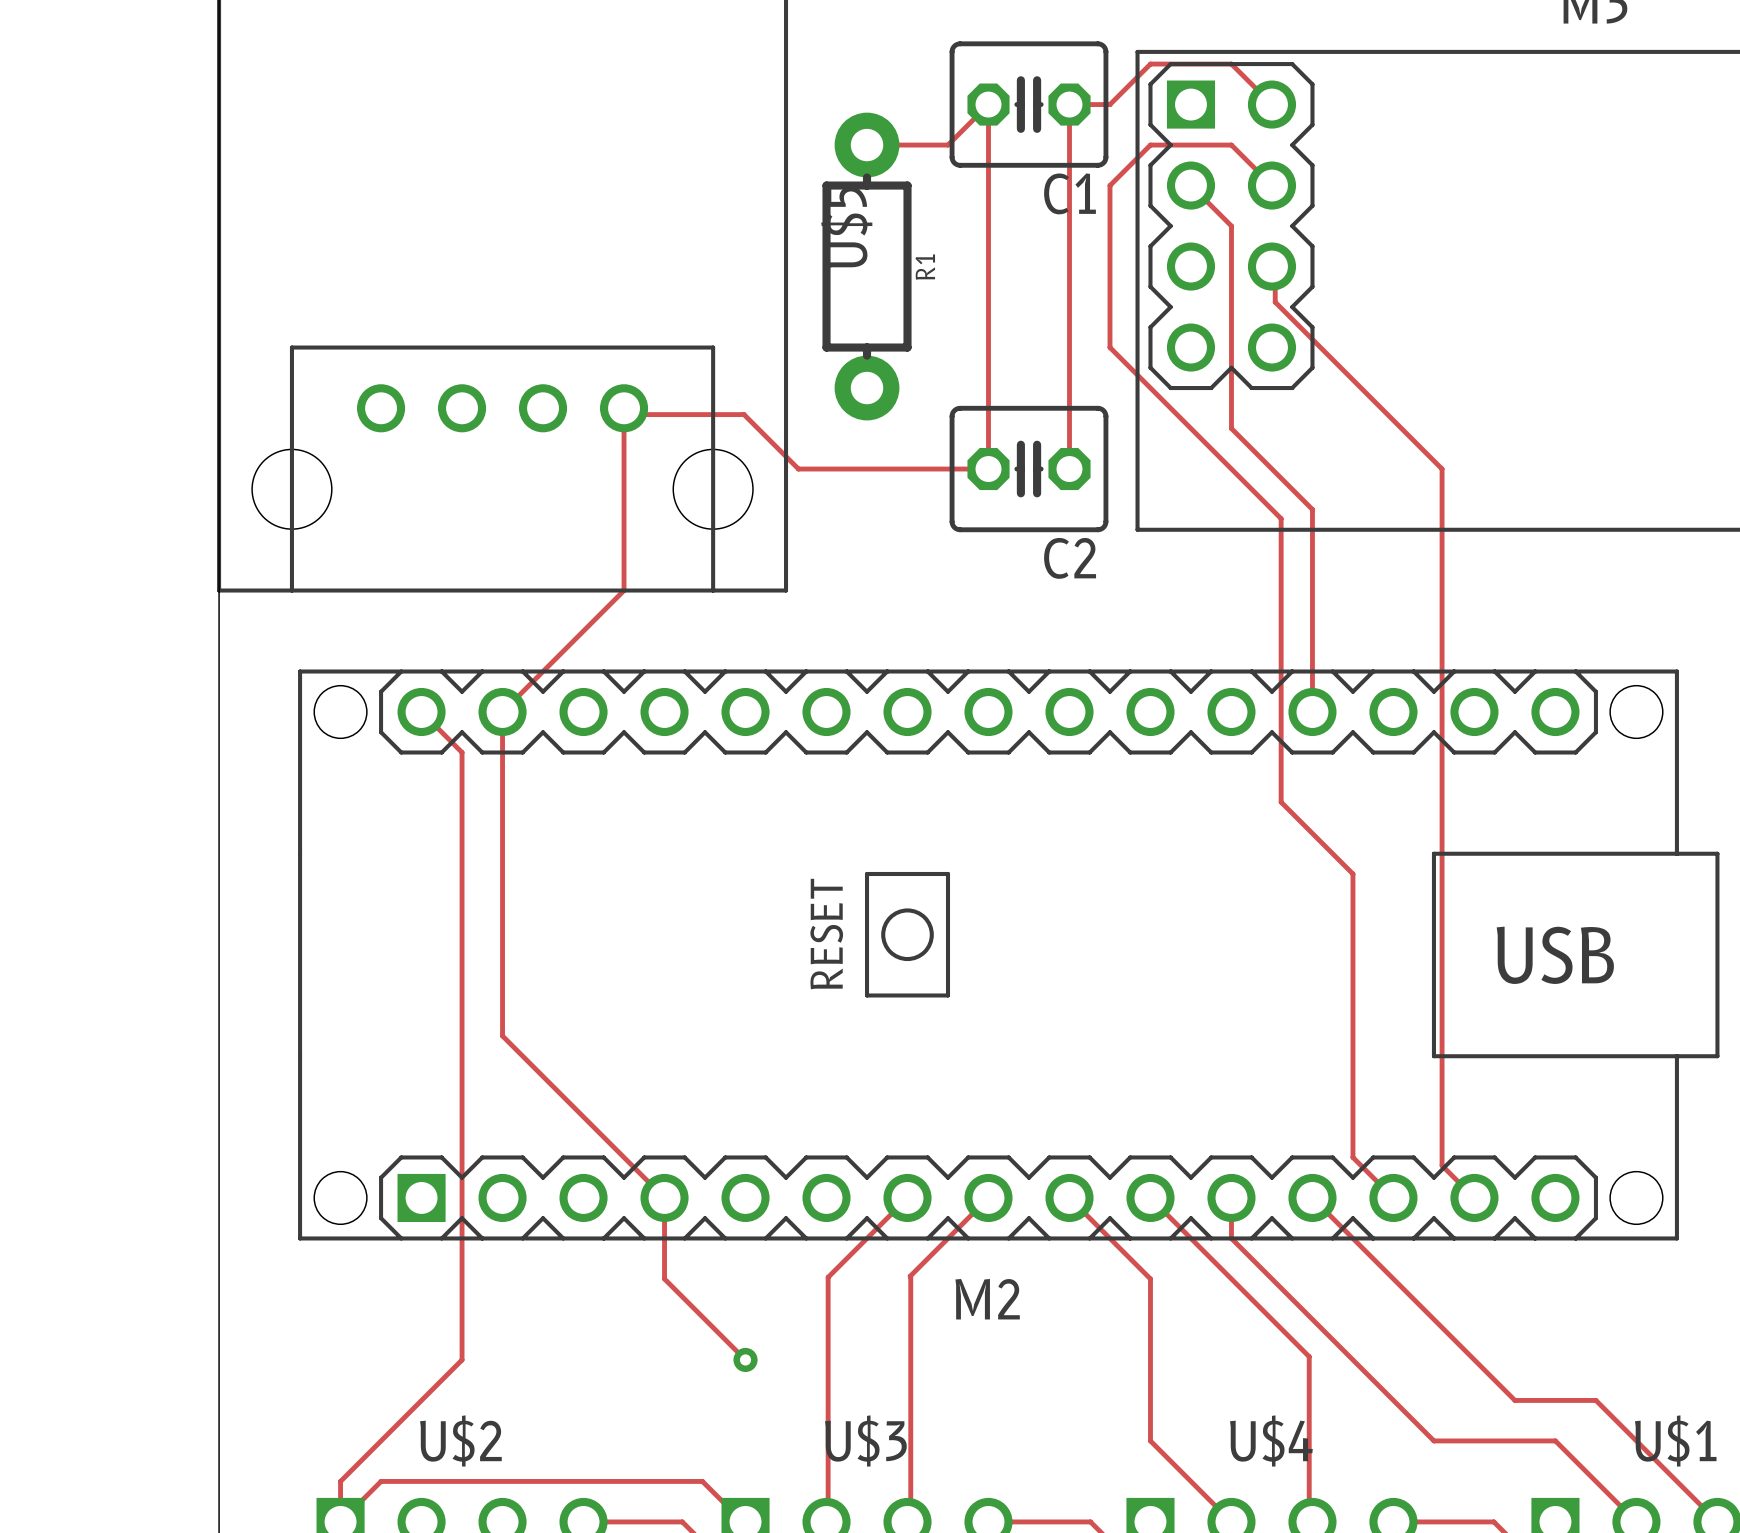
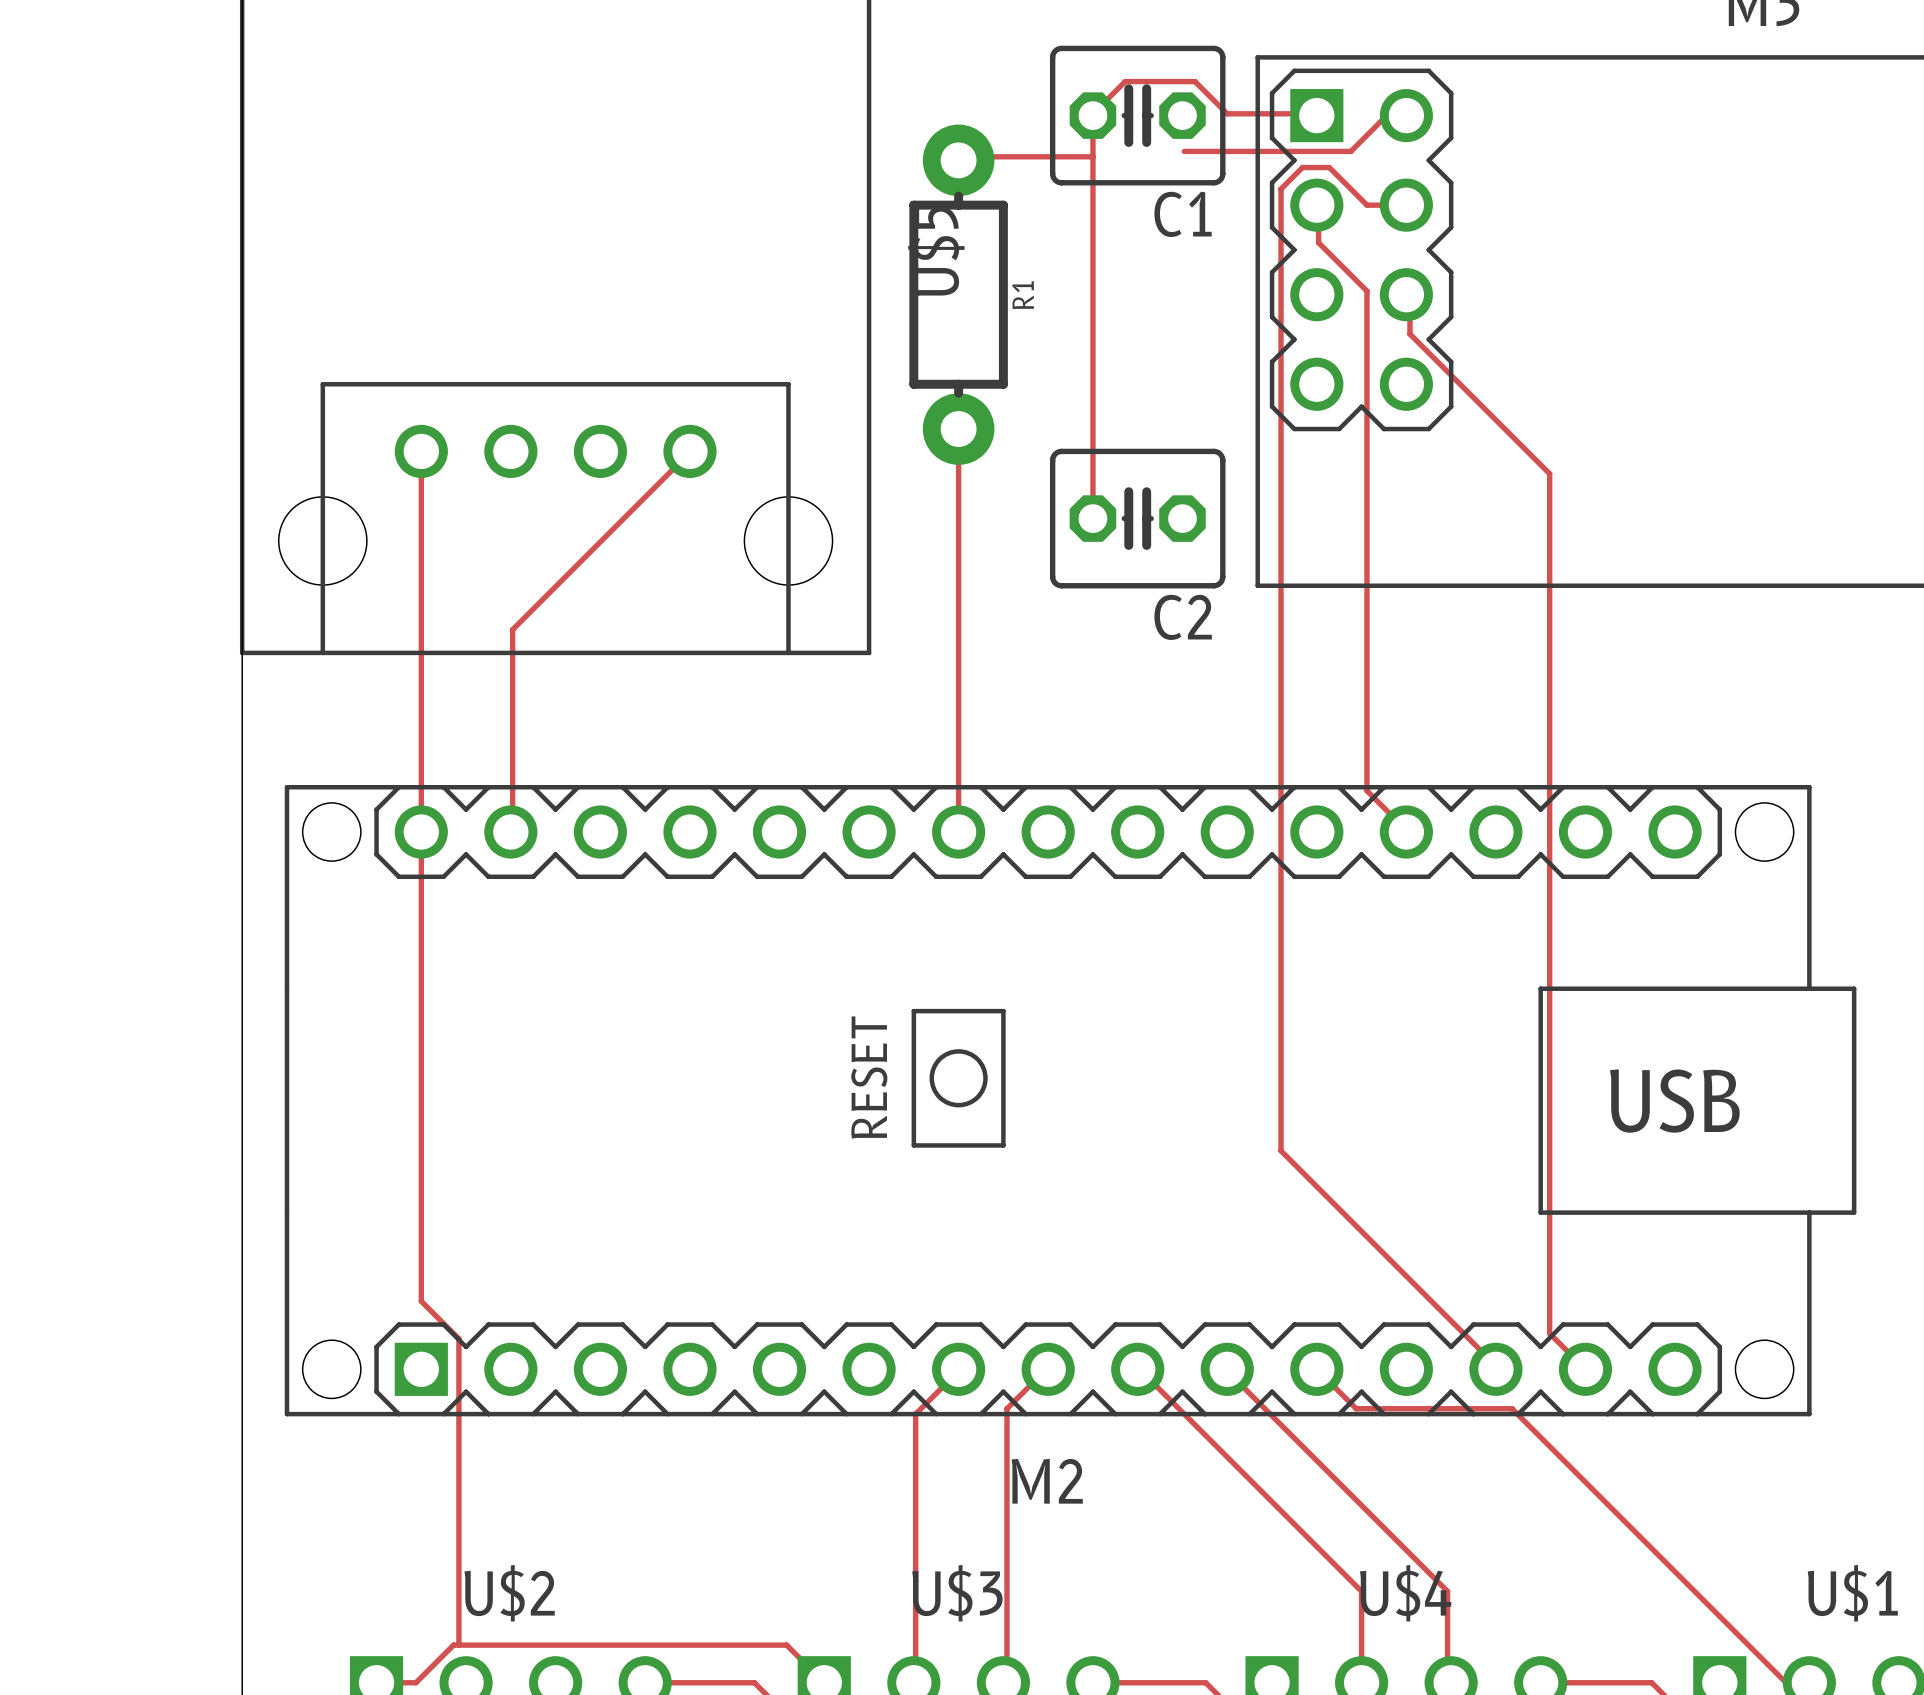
track: (988, 104) (948, 145) (867, 145) -> (1092, 156) (958, 156) (958, 160)
track: none -> (1092, 115) (1125, 81) (1195, 81) (1227, 113) (1313, 113) (1316, 115)
track: (1271, 104) (1231, 64) (1150, 64) (1109, 104) (1069, 104) (1069, 469) -> (1406, 115) (1404, 119) (1383, 119) (1350, 151) (1184, 151)
track: (1190, 185) (1231, 226) (1231, 428) (1312, 509) (1312, 712) -> (1316, 205) (1318, 205) (1318, 242) (1366, 291) (1366, 790) (1406, 832)
track: (1271, 185) (1231, 145) (1150, 145) (1109, 185) (1109, 347) (1281, 518) (1281, 802) (1352, 873) (1352, 1157) (1393, 1197) -> (1406, 205) (1366, 205) (1329, 167) (1302, 167) (1281, 189) (1281, 1150) (1495, 1365) (1495, 1369)
track: none -> (958, 429) (958, 832)
track: none -> (421, 451) (421, 1301) (458, 1338) (458, 1645)
track: (624, 408) (630, 414) (744, 414) (798, 469) (988, 469) -> (689, 452) (512, 629) (512, 828) (510, 832)
track: (624, 409) (624, 590) (502, 712) (502, 1035) (664, 1197) (664, 1278) (745, 1359) -> none
track: (1401, 428) (1442, 469) (1442, 1165) (1474, 1197) -> (1549, 473) (1549, 1333) (1585, 1369)
track: (421, 712) (462, 752) (462, 1359) (340, 1481) (340, 1521) (381, 1481) (702, 1481) (741, 1520) (745, 1521) -> (376, 1682) (415, 1682) (453, 1645) (786, 1645) (824, 1682)
M2 position: (1008, 954) -> (1070, 1100)
track: (907, 1197) (828, 1278) -> (958, 1369) (915, 1414)
track: (988, 1197) (910, 1277) -> (1048, 1369) (1006, 1408) (1006, 1412)
track: (1069, 1197) (1150, 1278) (1150, 1440) (1231, 1521) -> (1137, 1369) (1361, 1591) (1361, 1682)
track: (1150, 1197) (1190, 1238) -> none
track: (1231, 1197) (1231, 1238) (1433, 1440) (1555, 1440) (1636, 1521) -> (1356, 1408) (1512, 1408) (1786, 1682) (1809, 1682)
track: (1312, 1197) (1514, 1400) (1595, 1400) (1717, 1521) -> none
track: (1226, 1274) (1309, 1356) (1309, 1439) -> (1227, 1369) (1447, 1591)
via: (745, 1359) -> none

